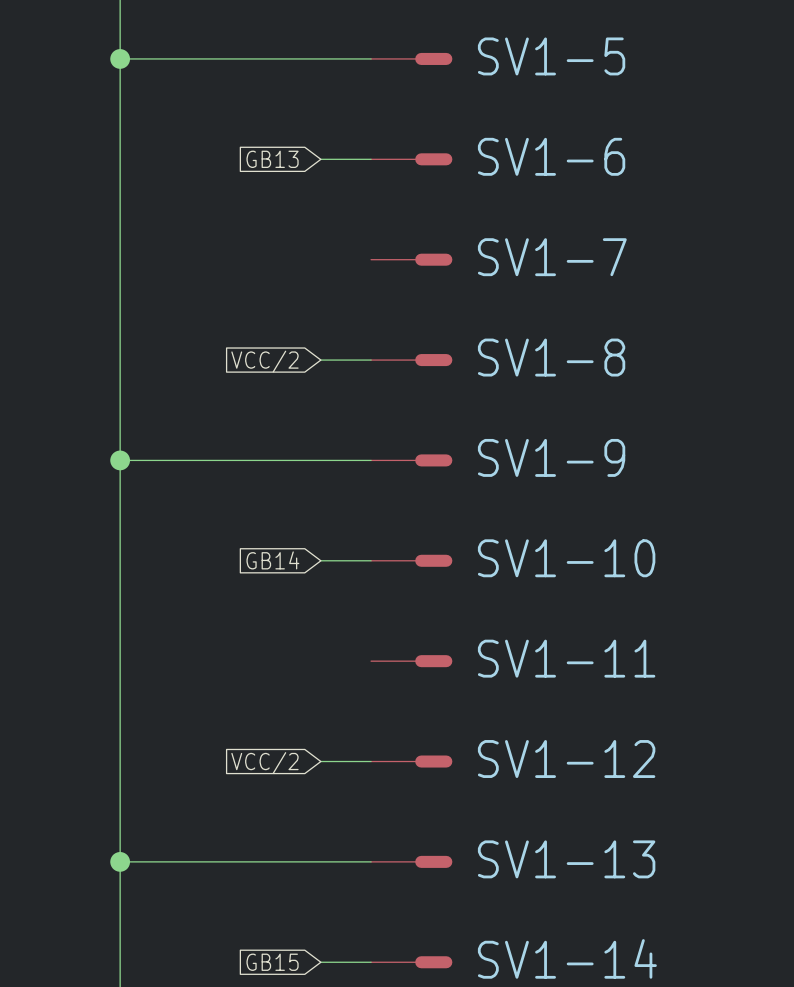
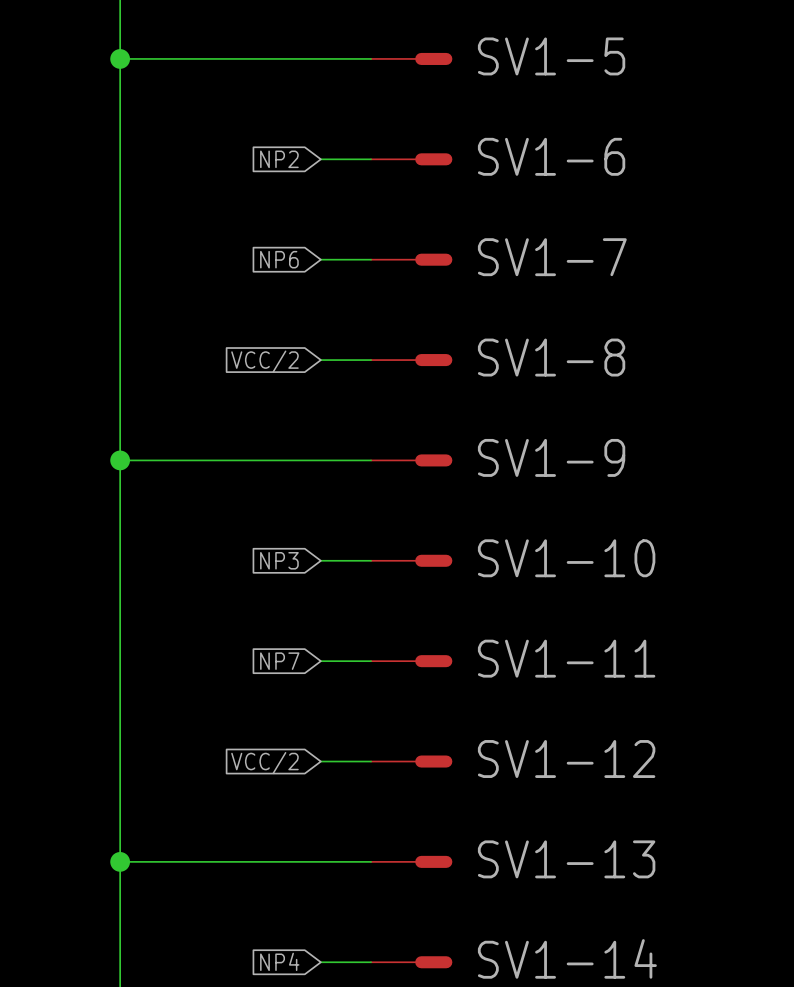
global label: GB13 (272, 159) -> NP2 (279, 159)
global label: none -> NP6 (279, 259)
wire: none -> (320, 259) (371, 259)
global label: GB14 (272, 560) -> NP3 (279, 560)
global label: none -> NP7 (279, 661)
wire: none -> (320, 661) (371, 661)
global label: GB15 (272, 962) -> NP4 (279, 961)

